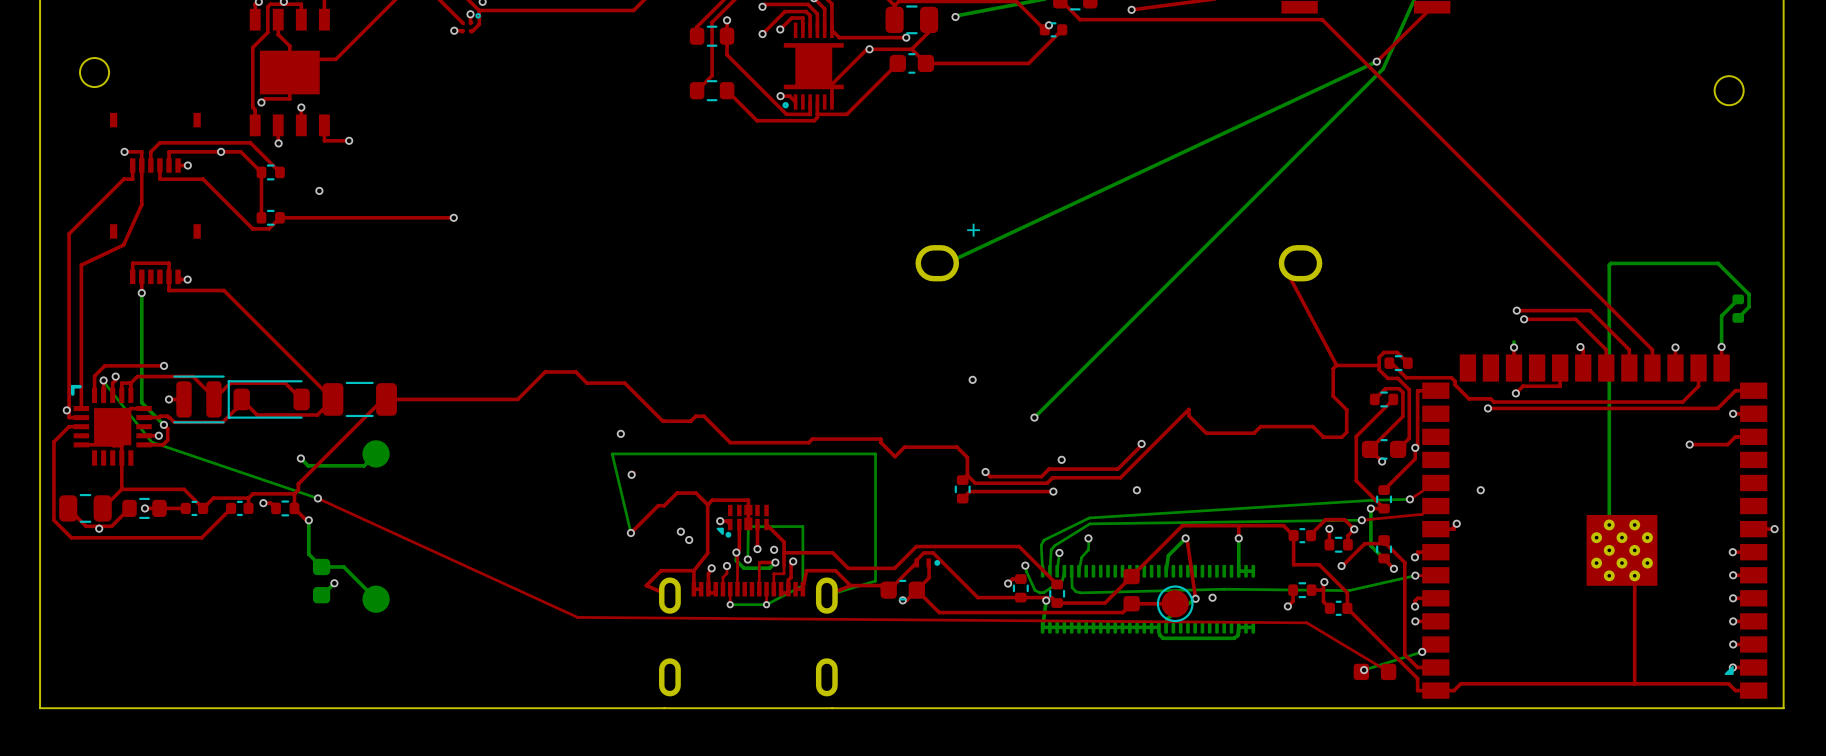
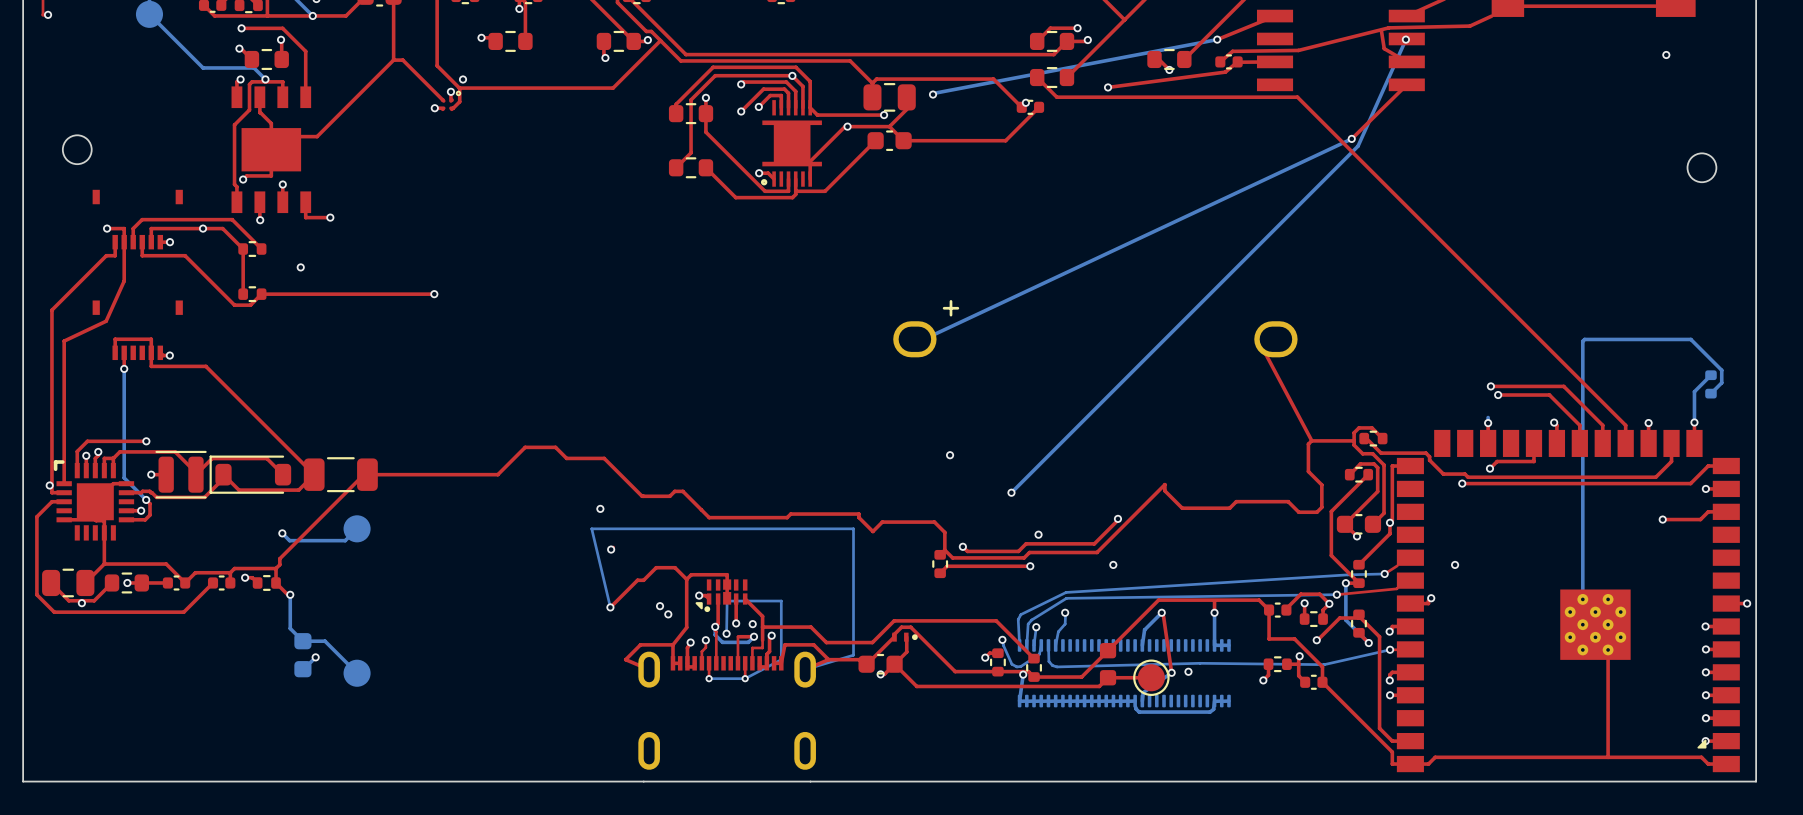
bottom track: (105, 384) (151, 442) (317, 498) -> none
top track: (317, 498) (577, 617) (1306, 622) (1388, 671) -> none
via: (317, 498) -> none
bottom track: (1422, 651) (1364, 670) -> none
via: (1422, 651) -> none
via: (1364, 670) -> none
part: (1374, 671) -> none

